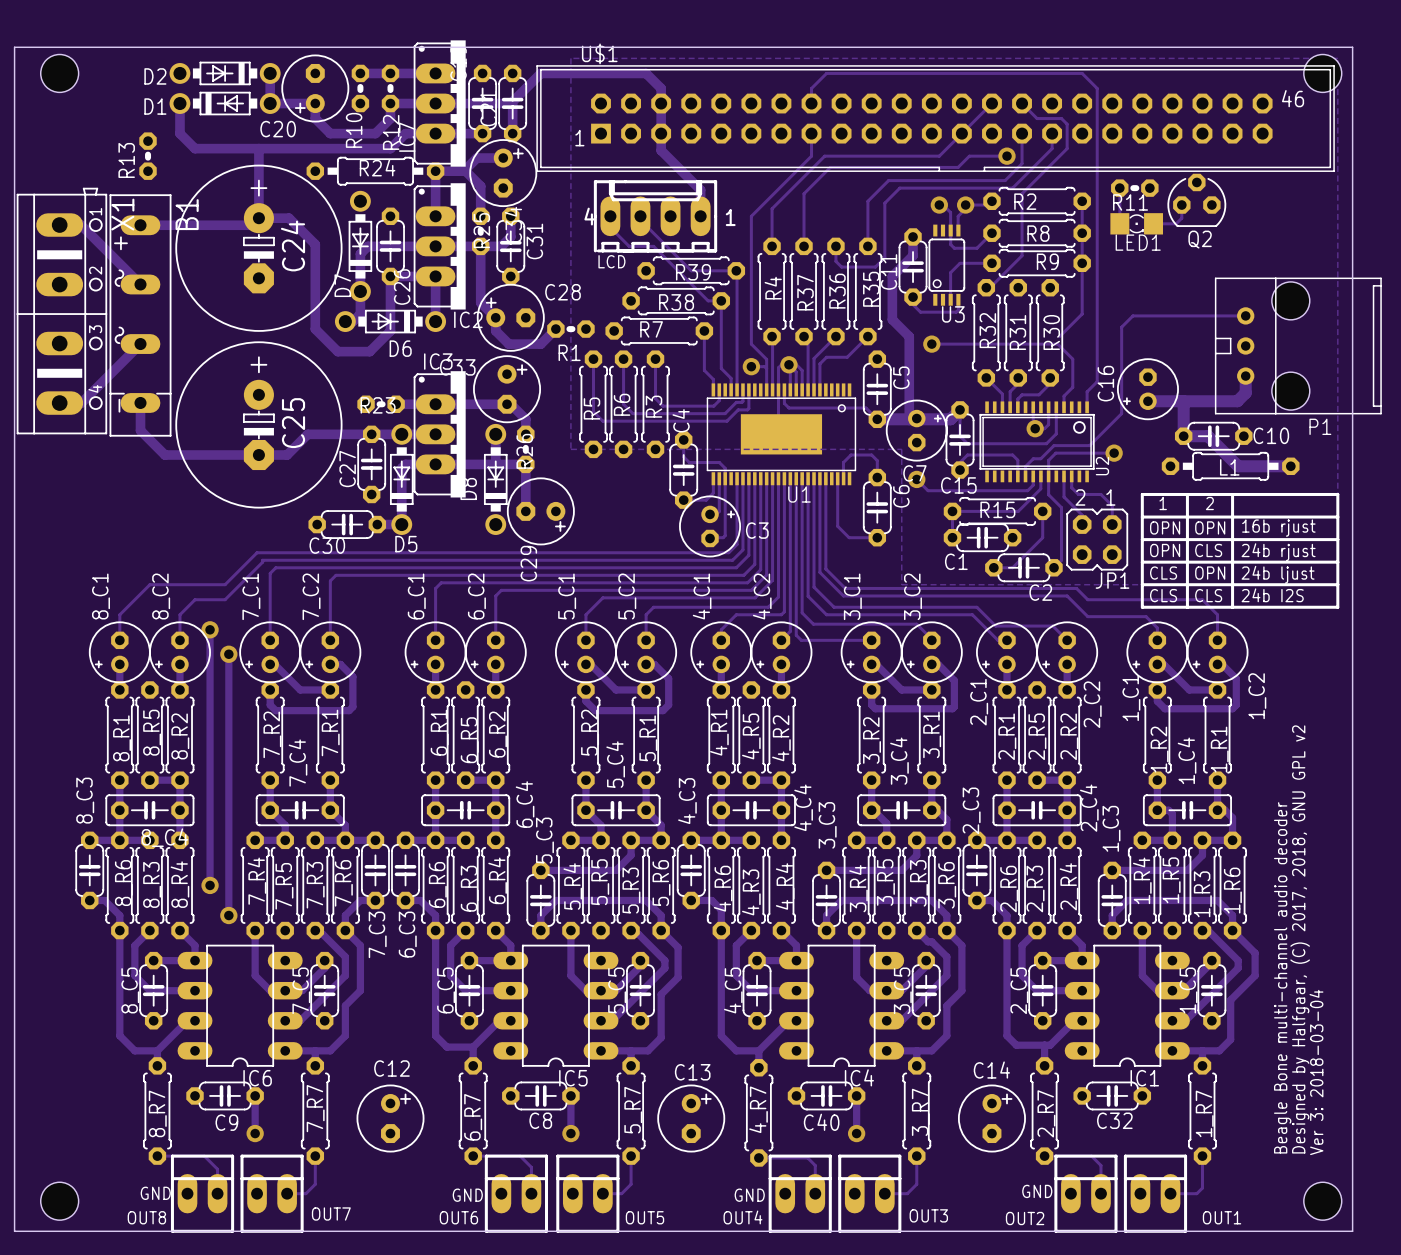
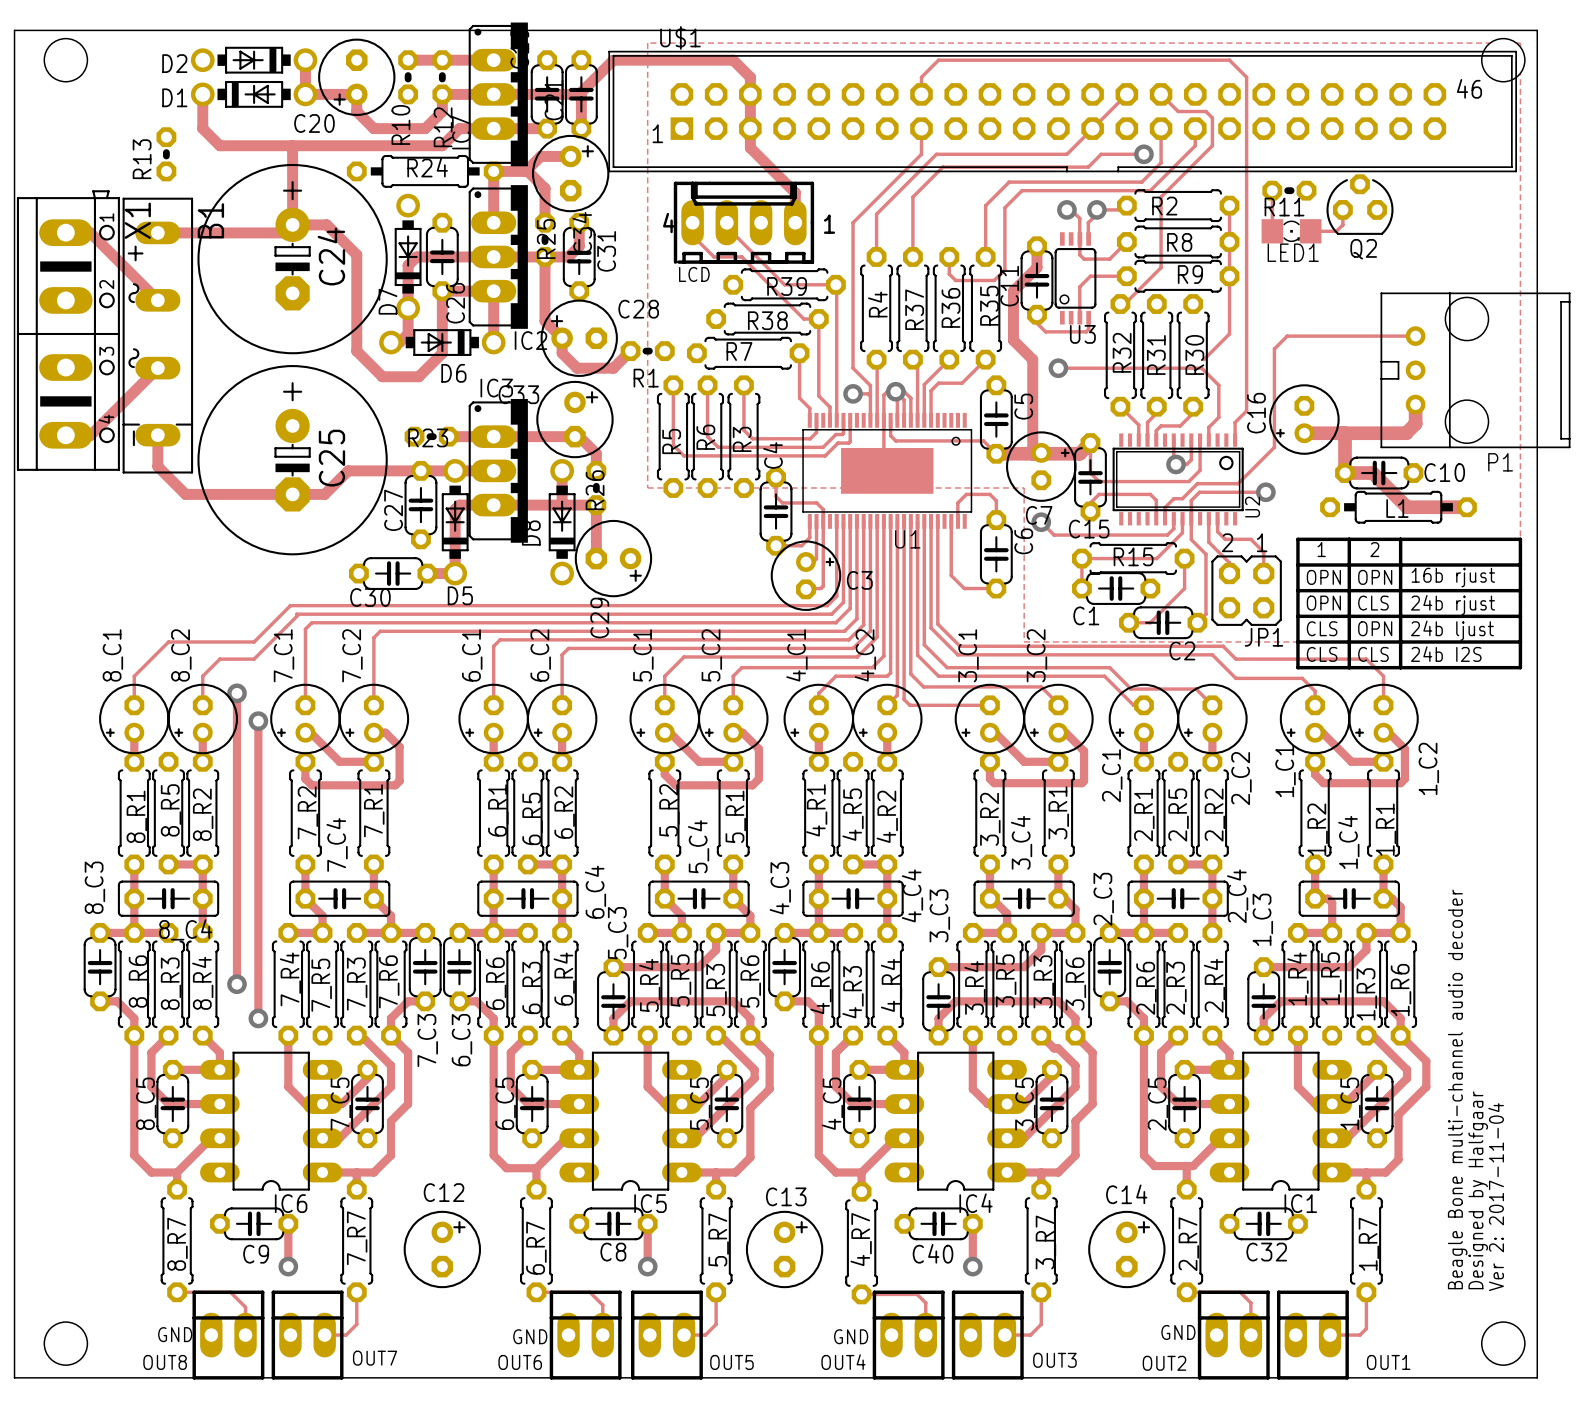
text: Designed by Halfgaar, (C) 2017, 2018, GNU GPL v2 (1300, 939) -> Designed by Halfgaar (1478, 1190)
text: Ver 3: 2018-03-04 (1316, 1072) -> Ver 2: 2017-11-04 (1496, 1197)

